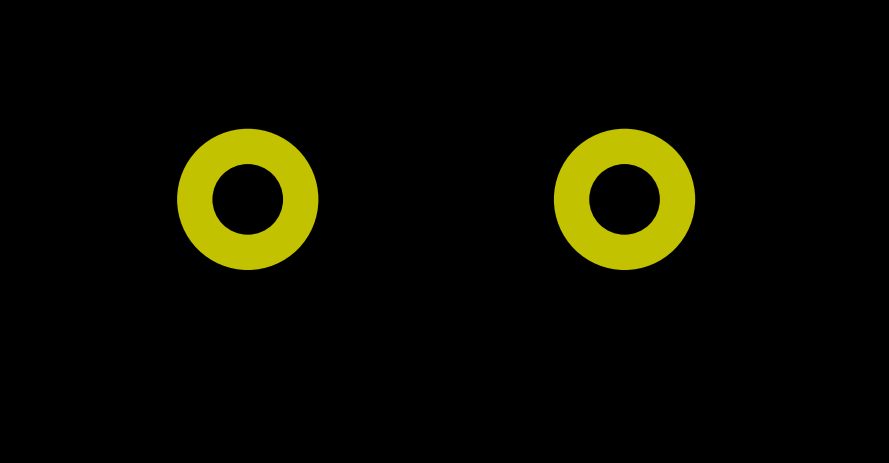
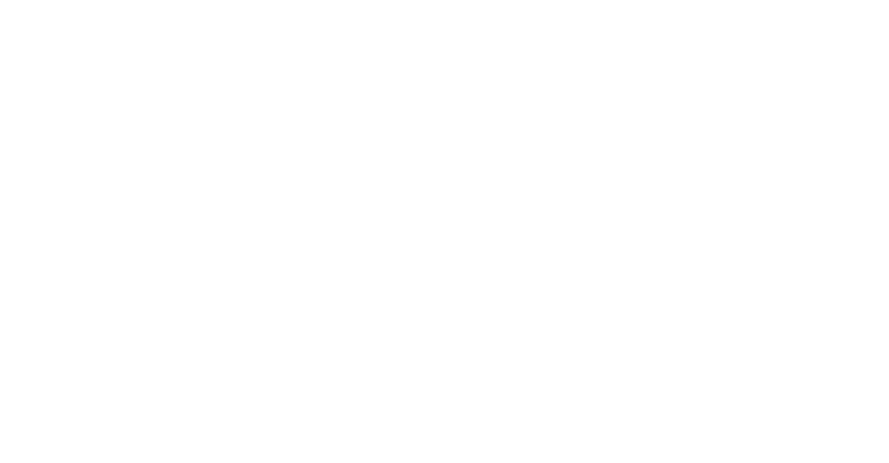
part: (247, 199) -> none
part: (624, 199) -> none

